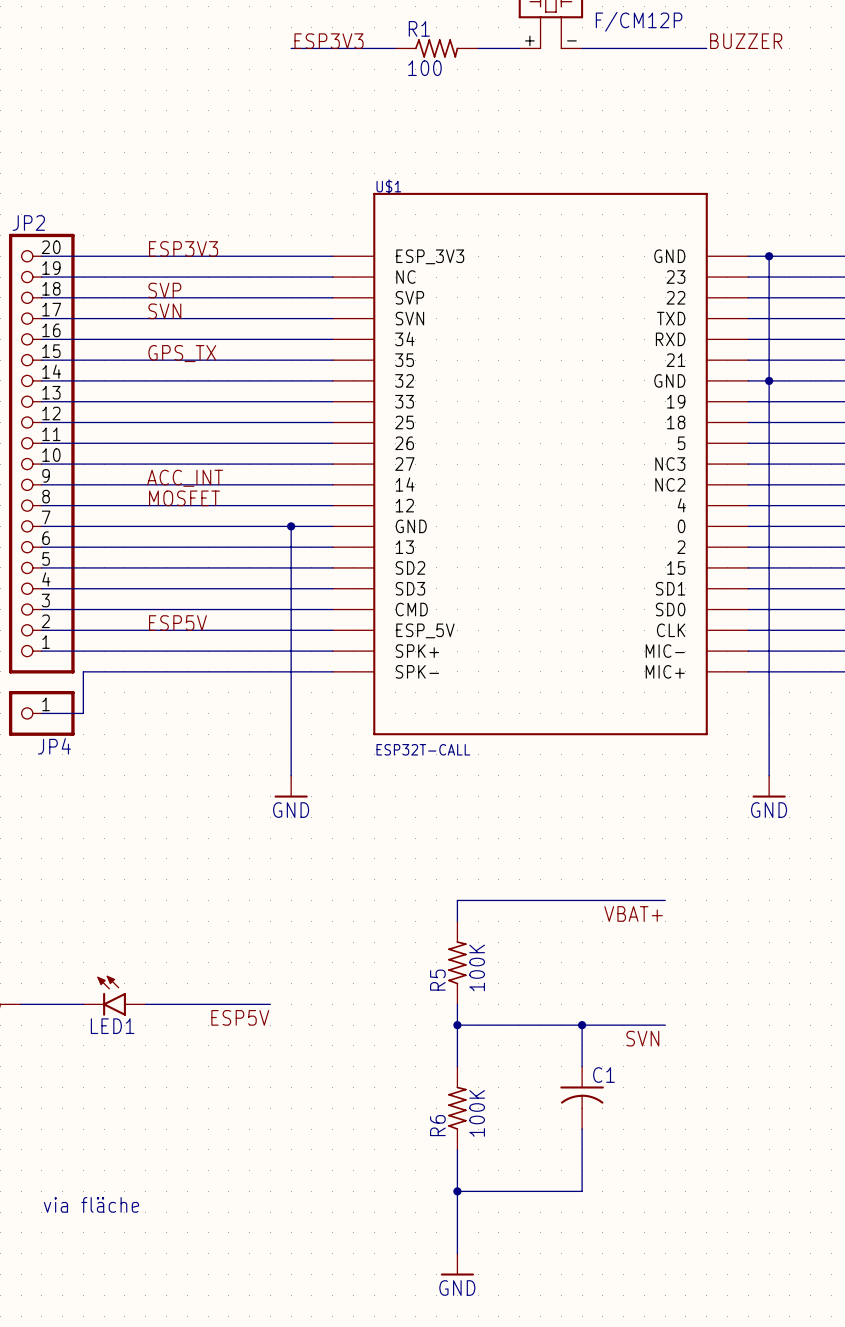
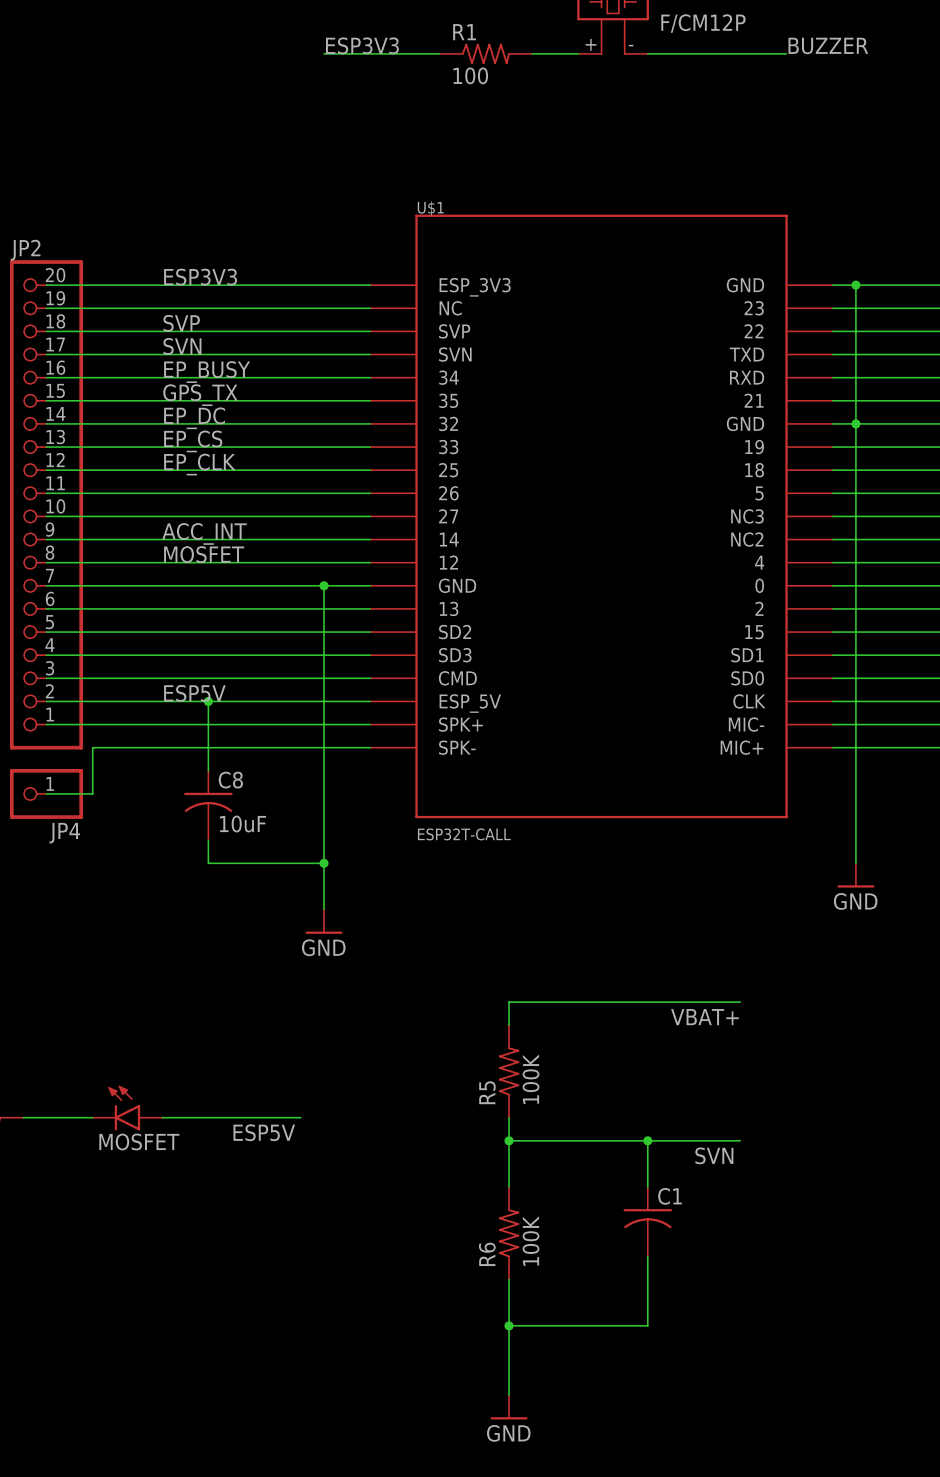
label: none -> EP_BUSY (207, 372)
label: none -> EP_DC (194, 418)
label: none -> EP_CS (193, 441)
label: none -> EP_CLK (199, 464)
wire: none -> (208, 701) (208, 770)
junction: none -> (208, 701)
C8: none -> 10uF (208, 805)
wire: none -> (208, 840) (208, 863) (324, 863) (324, 909)
junction: none -> (324, 863)
power symbol position: GND (291, 786) -> GND (324, 921)
LED1 name: LED1 (112, 1026) -> MOSFET (139, 1142)
text: via fläche (91, 1204) -> none

